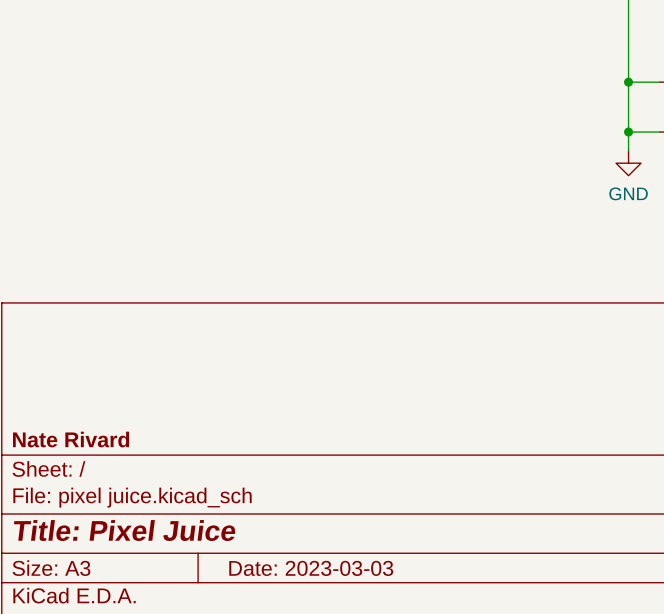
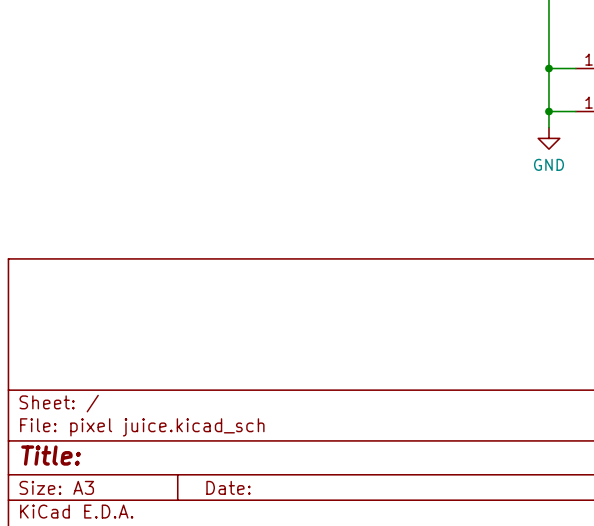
title block: Nate Rivard (71, 439) -> none
title block: Title: Pixel Juice (124, 530) -> Title: (51, 455)
title block: Date: 2023-03-03 (311, 568) -> Date: (228, 487)

